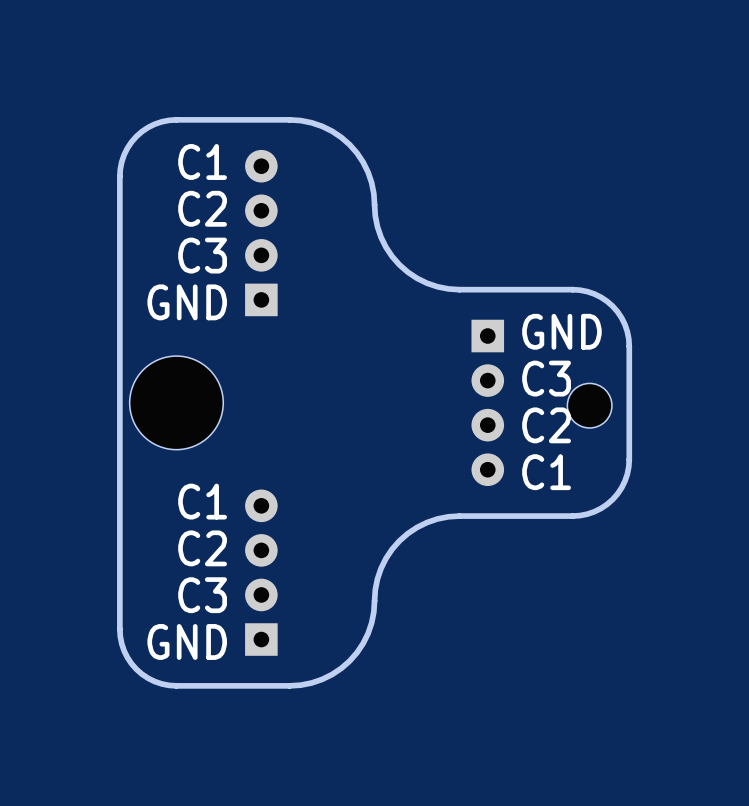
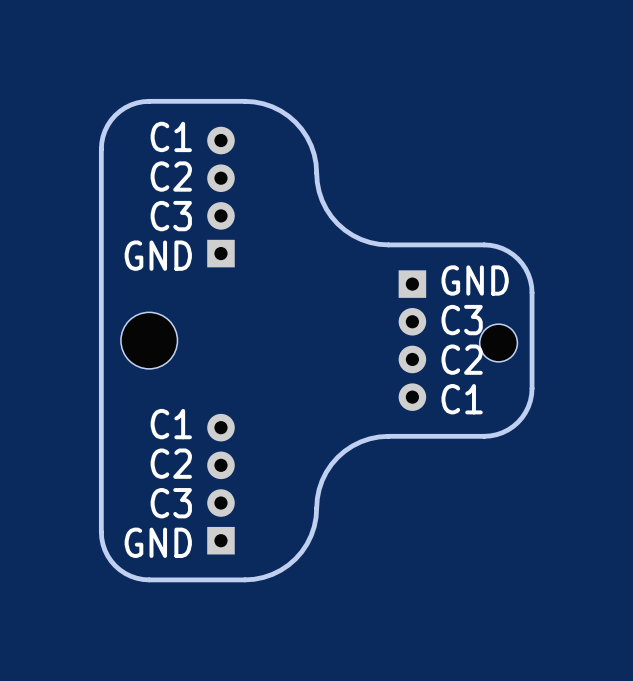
hole size: [129, 356, 224, 450] -> [120, 312, 178, 369]

